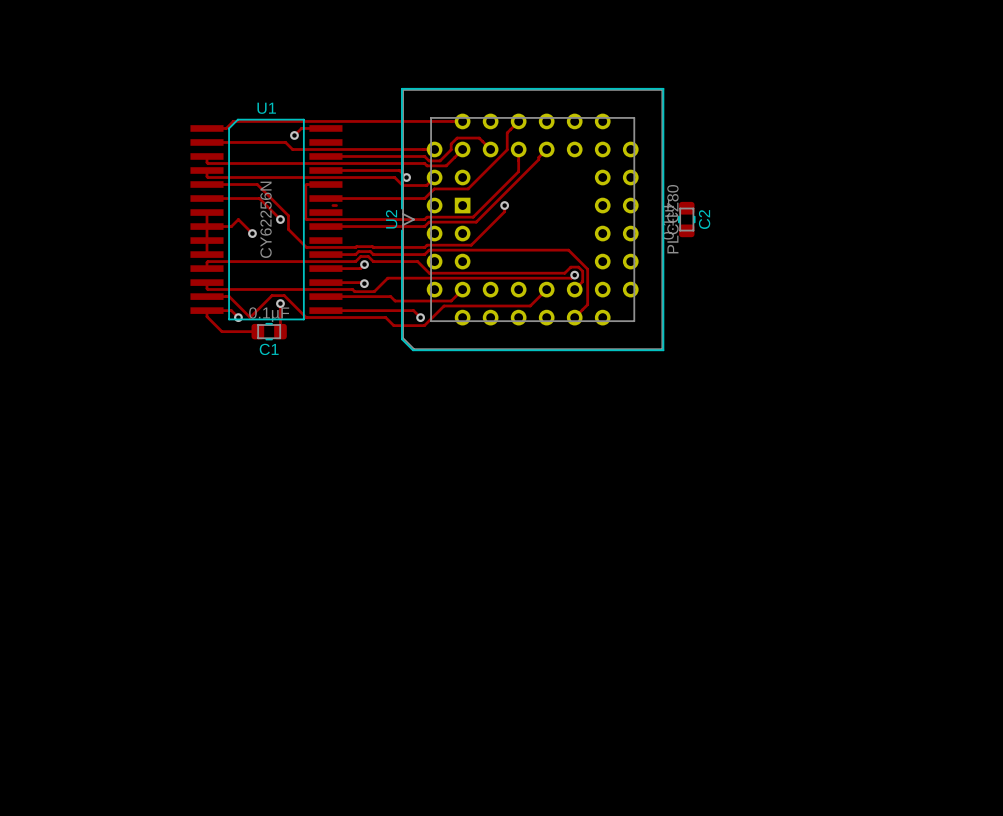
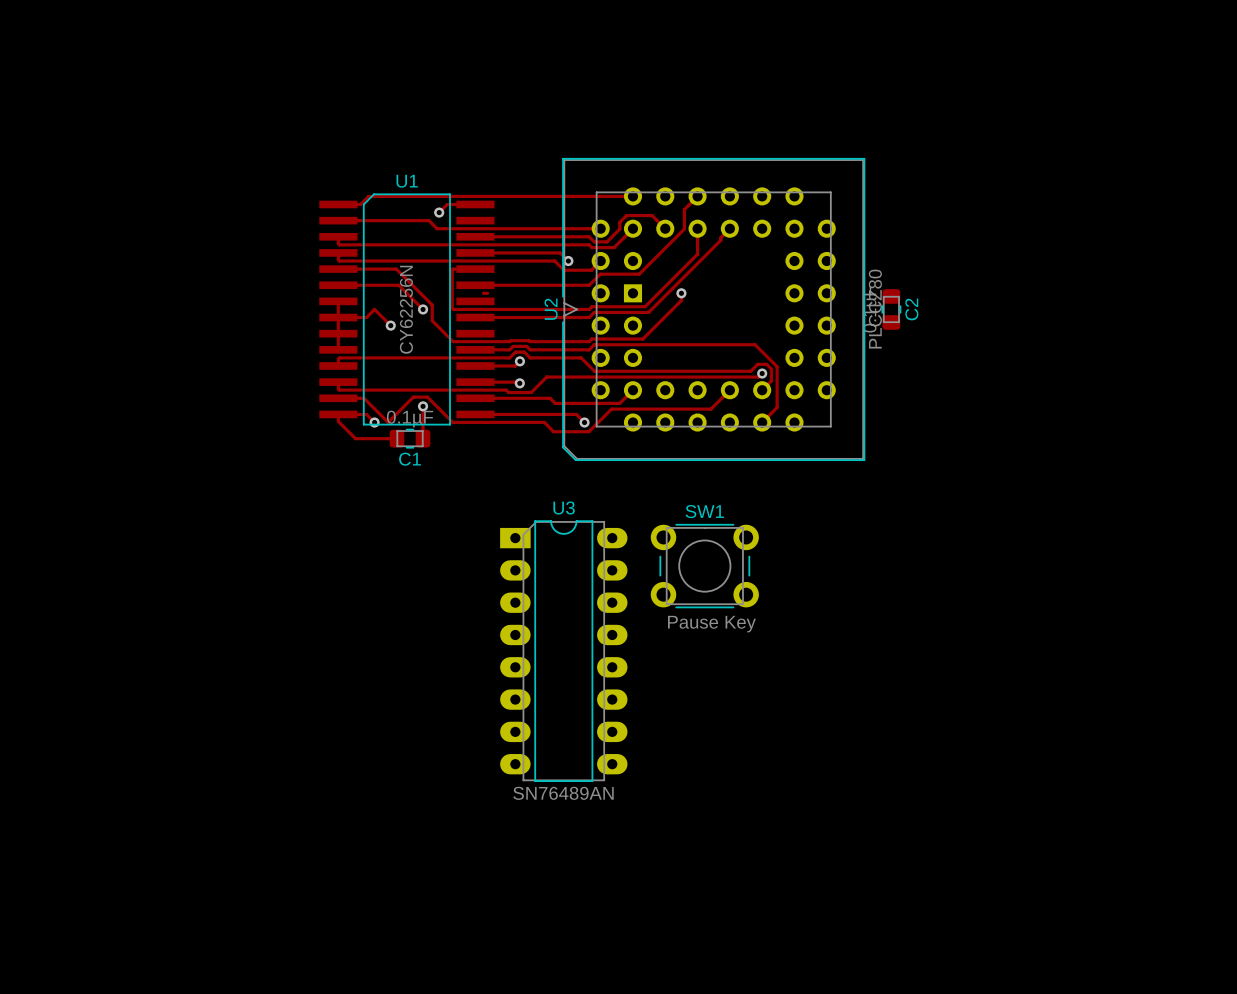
SW1: none -> Pause Key (704, 566)
U3: none -> SN76489AN (563, 651)

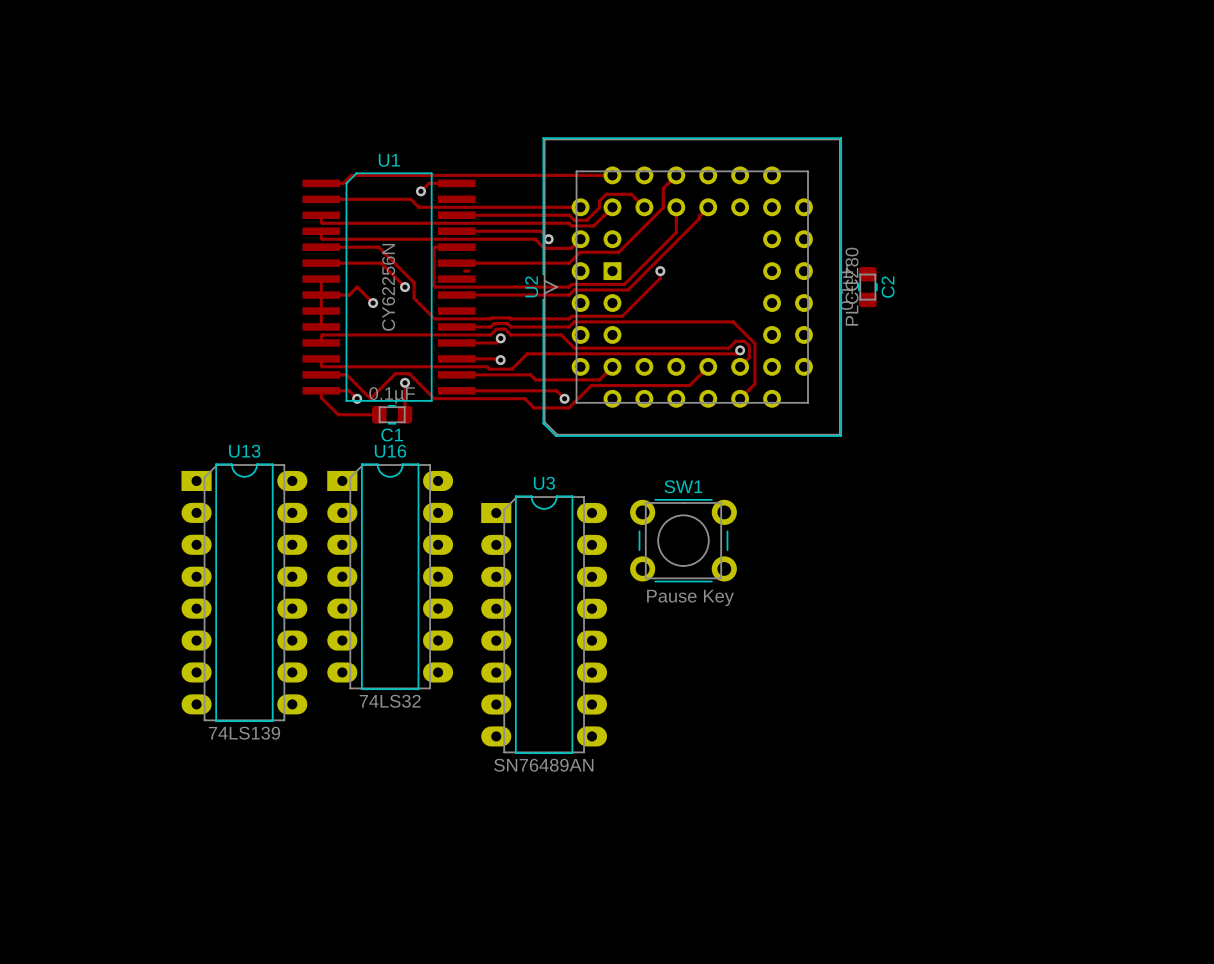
U16: none -> 74LS32 (390, 576)
U13: none -> 74LS139 (244, 592)

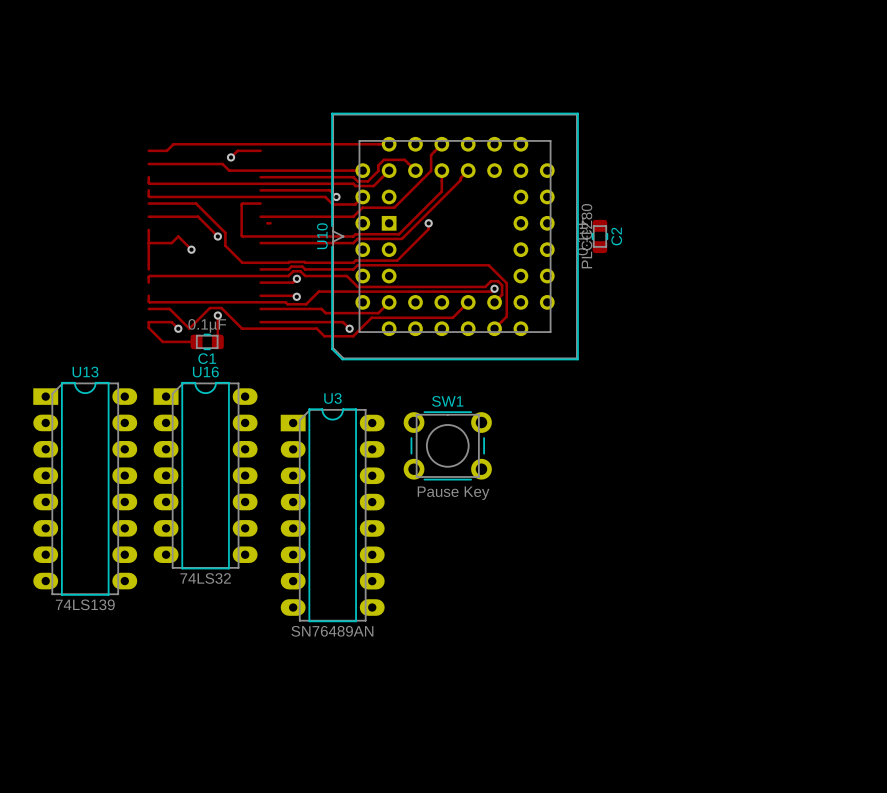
U2 name: U2 (531, 286) -> U10 (322, 236)
U1: CY62256N (389, 287) -> none

